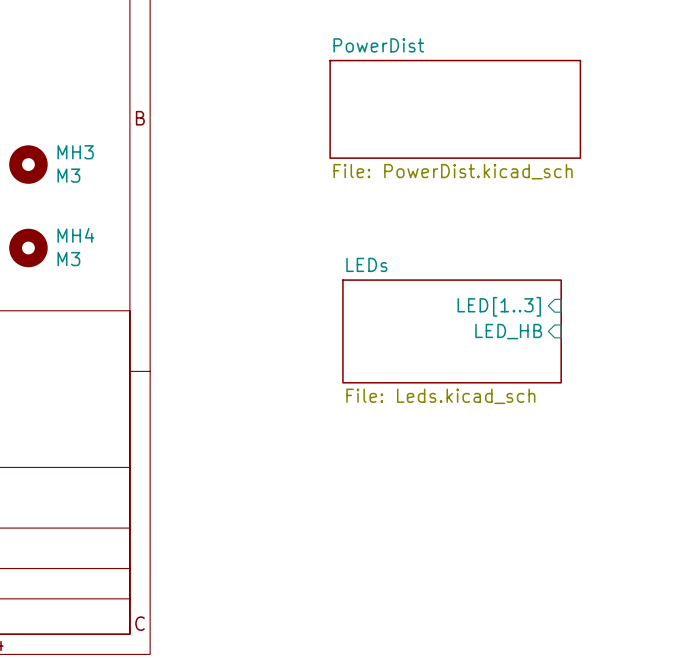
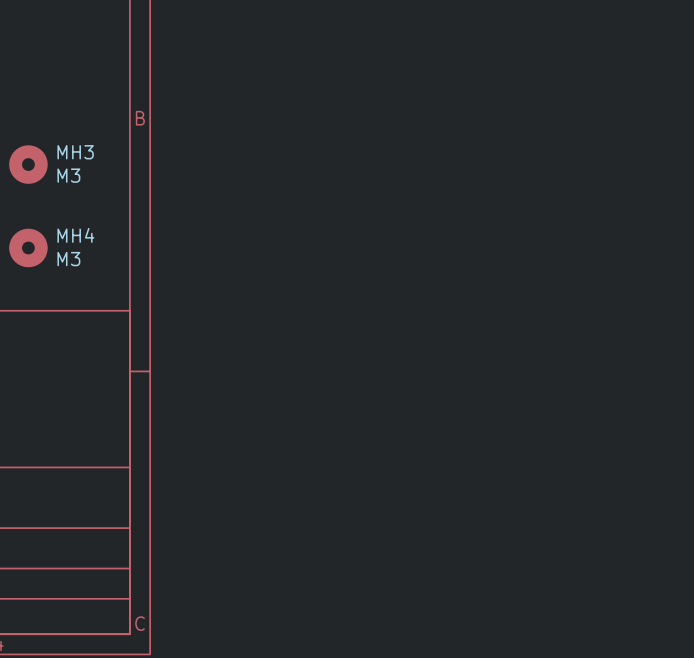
sheet PowerDist: File: PowerDist.kicad_sch (455, 109) -> none
sheet pin: LED[1..3] (499, 306) -> none
sheet LEDs: File: Leds.kicad_sch (452, 331) -> none
sheet pin: LED_HB (508, 331) -> none

